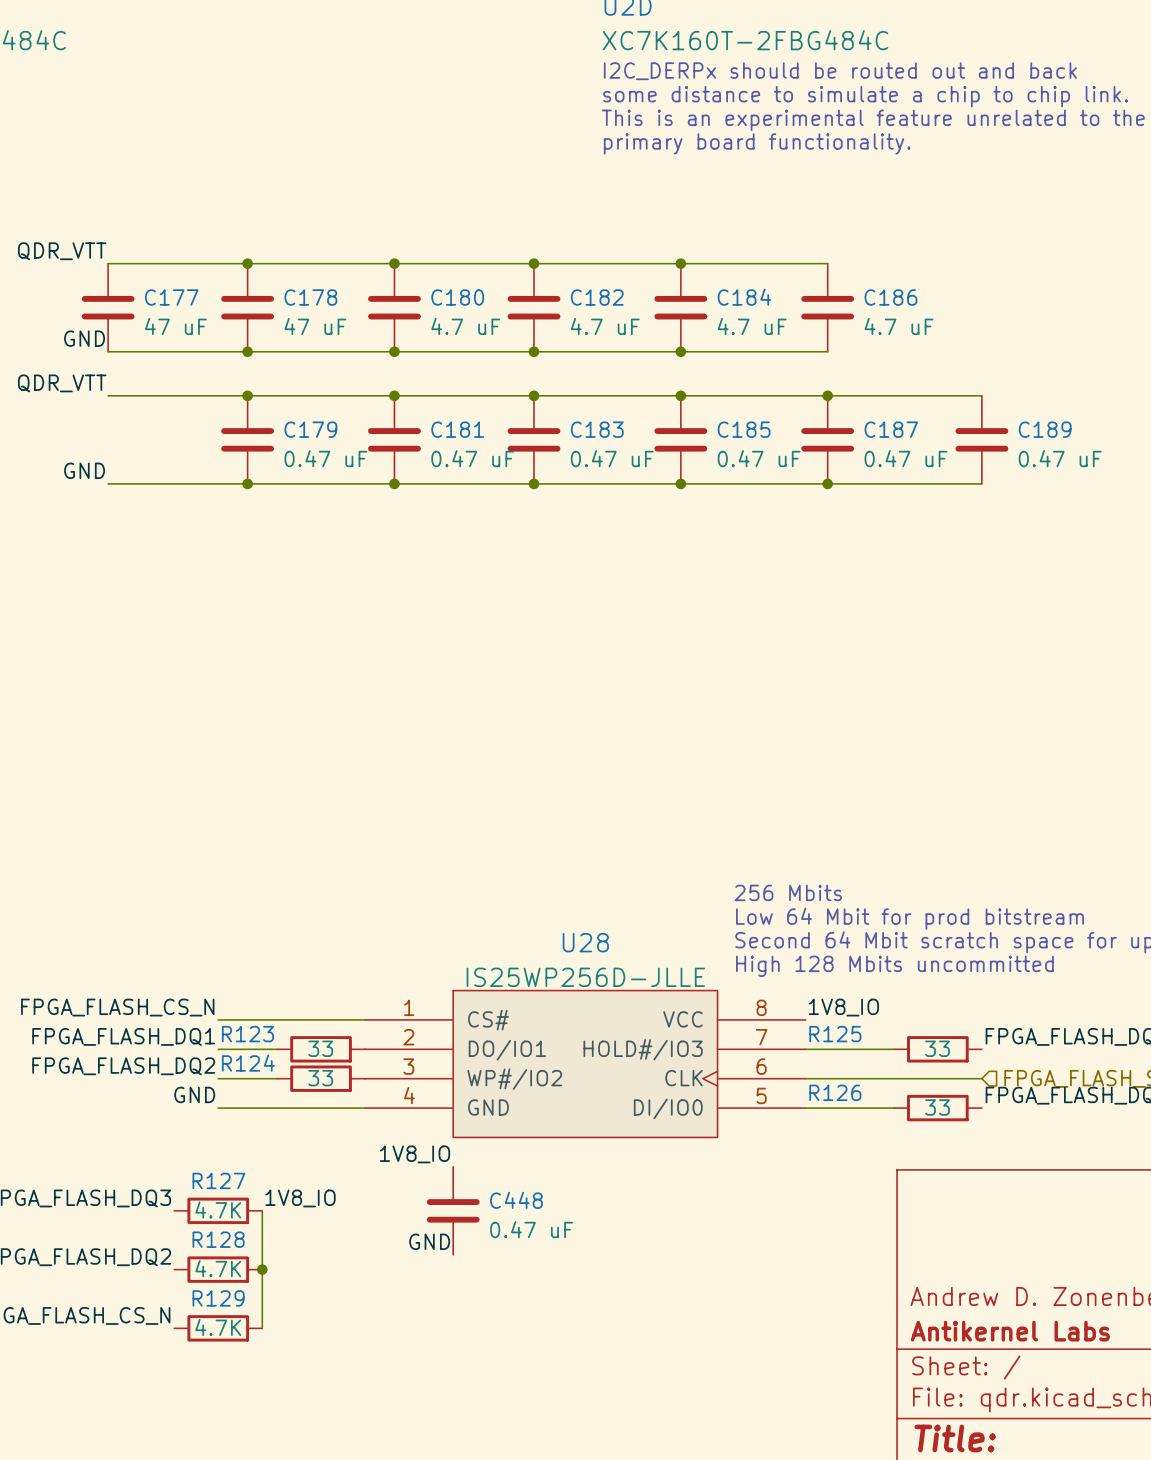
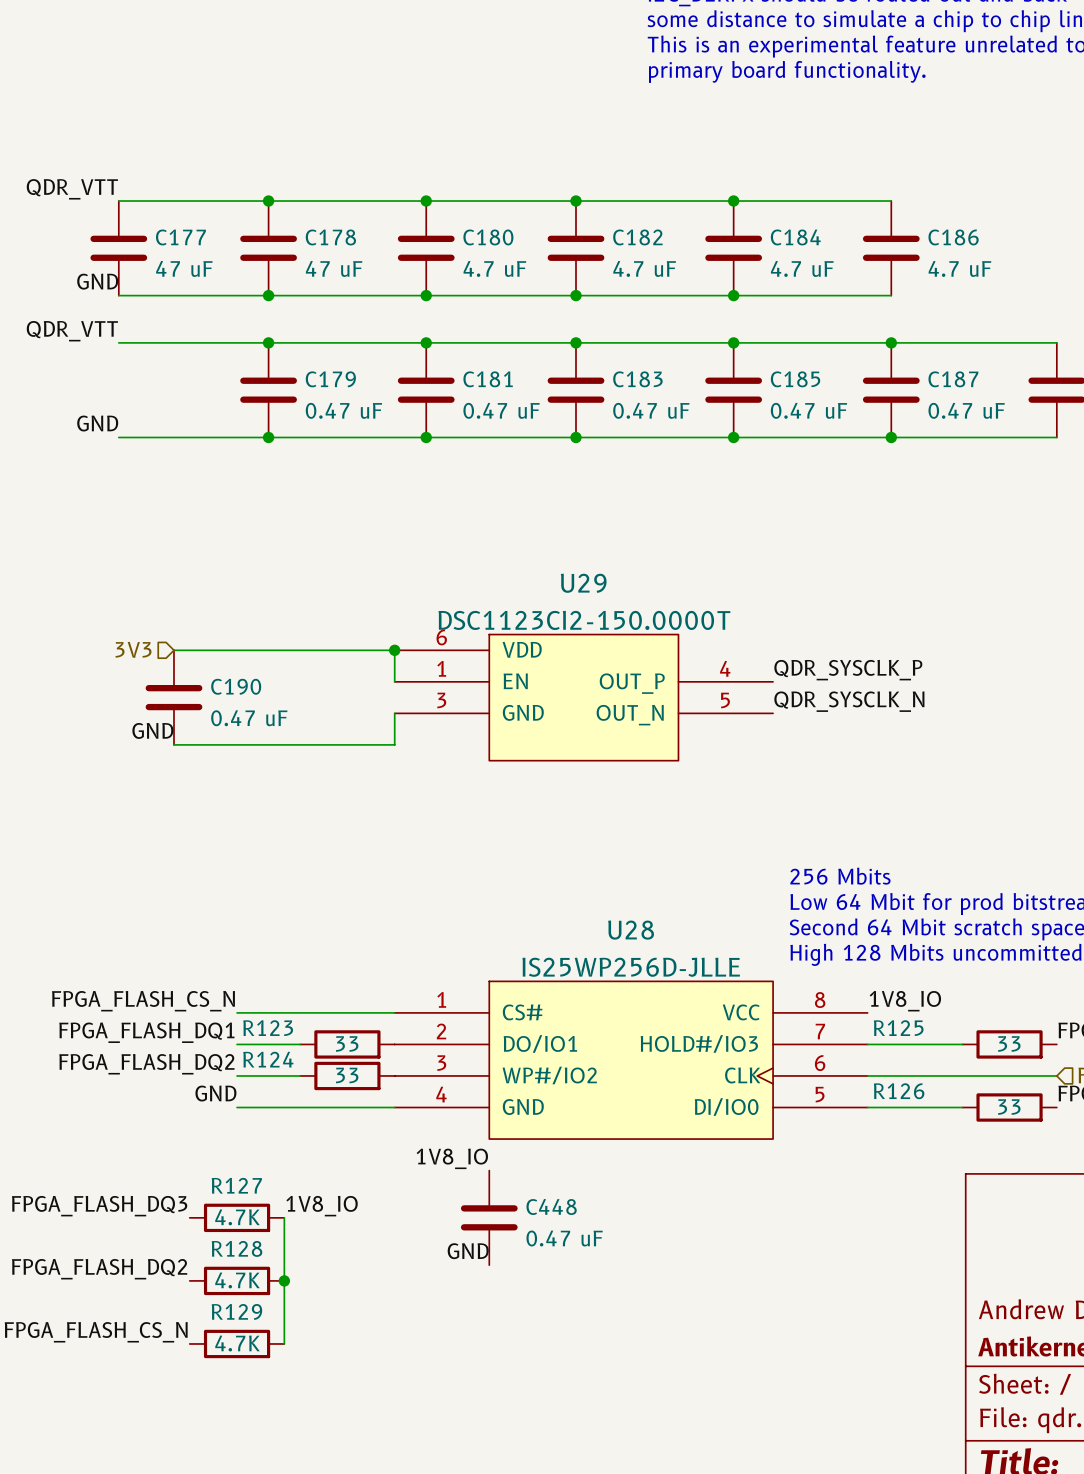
hierarchical label: none -> 3V3 (133, 649)
wire: none -> (173, 650) (394, 650) (394, 681)
junction: none -> (394, 650)
label: none -> QDR_SYSCLK_P (848, 670)
C190: none -> 0.47 uF (173, 697)
U29: none -> DSC1123CI2-150.0000T (583, 697)
label: none -> QDR_SYSCLK_N (849, 701)
wire: none -> (394, 713) (394, 744) (173, 744)
label: none -> GND (152, 730)

